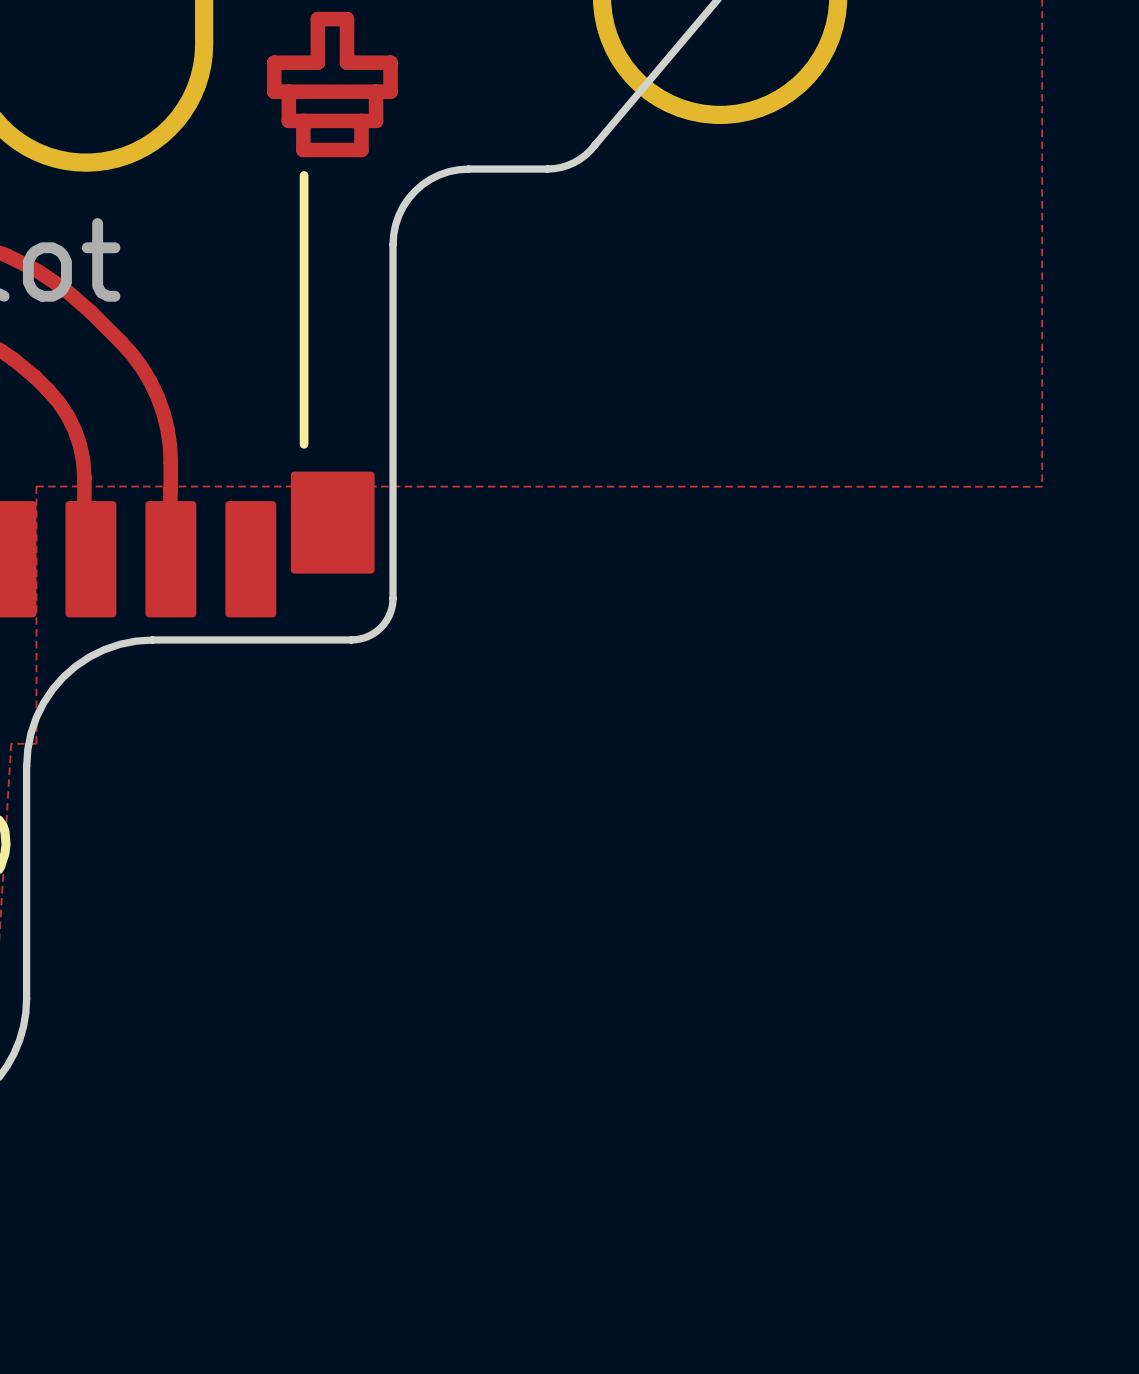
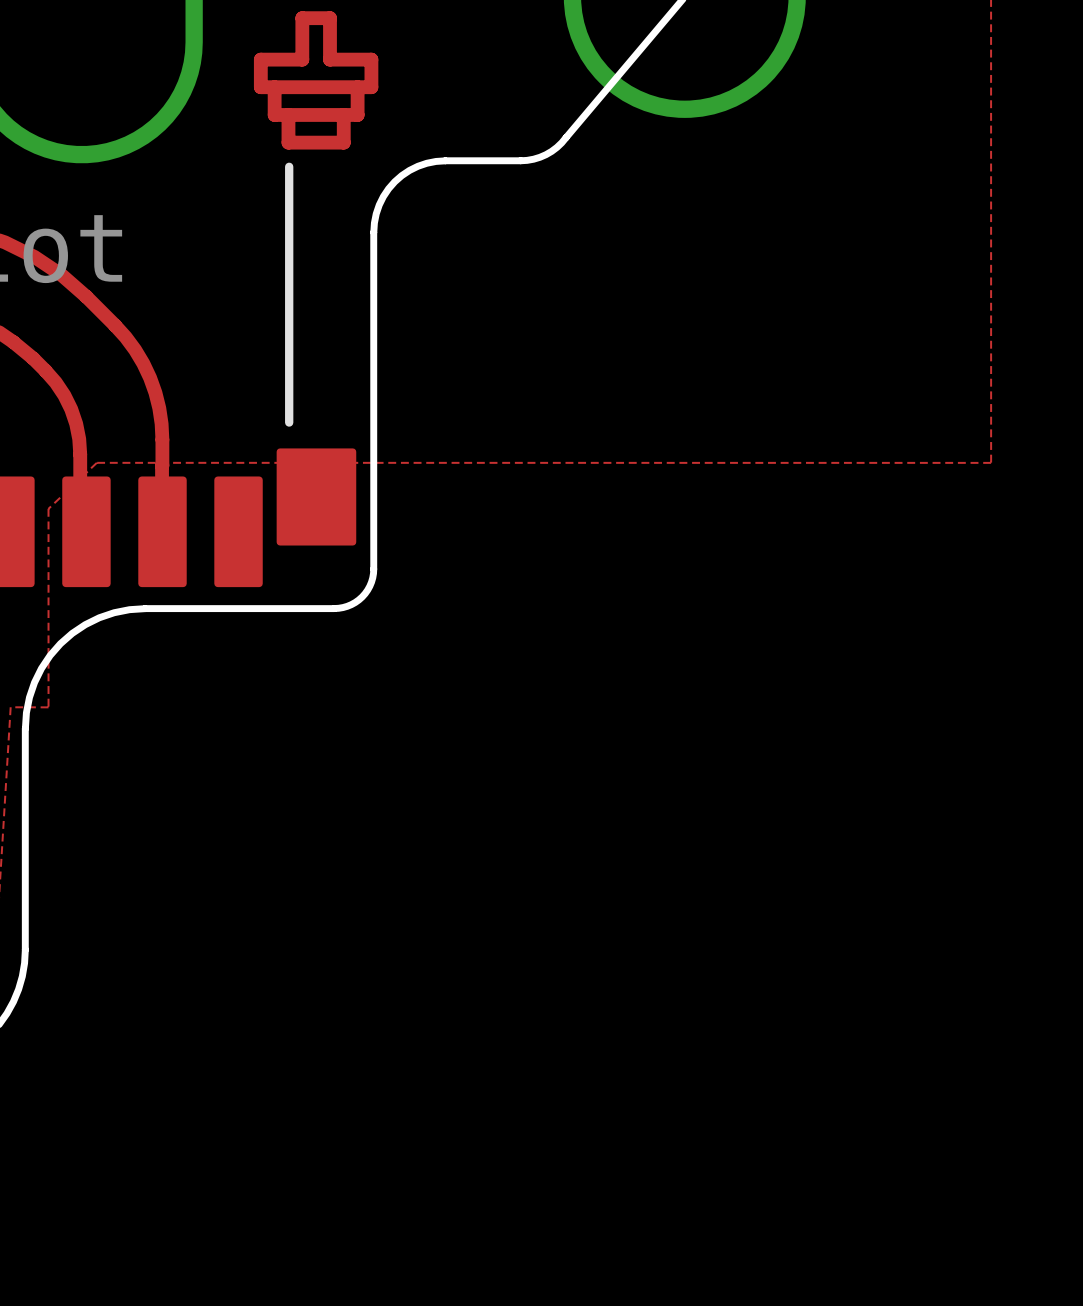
zone outline: (1042, 486) (36, 486) (36, 743) (11, 743) -> (991, 462) (96, 462) (48, 508) (48, 707) (10, 707)

